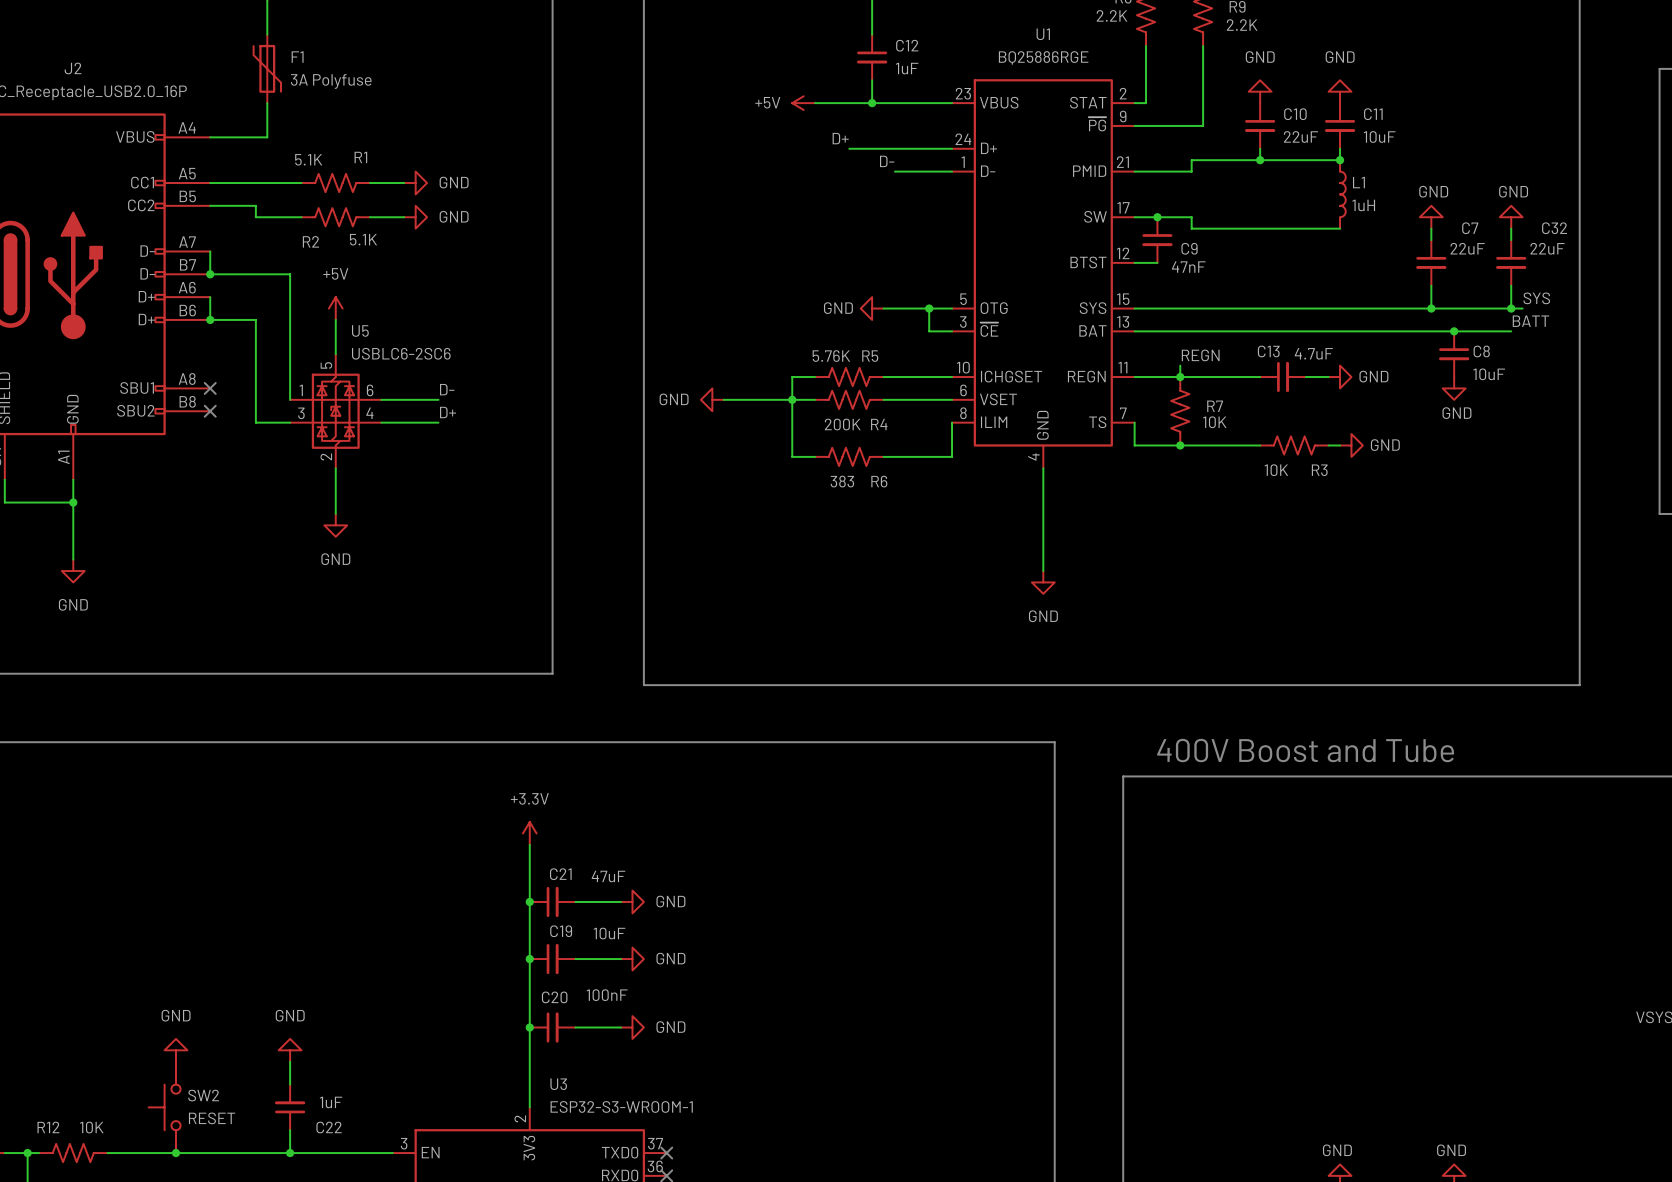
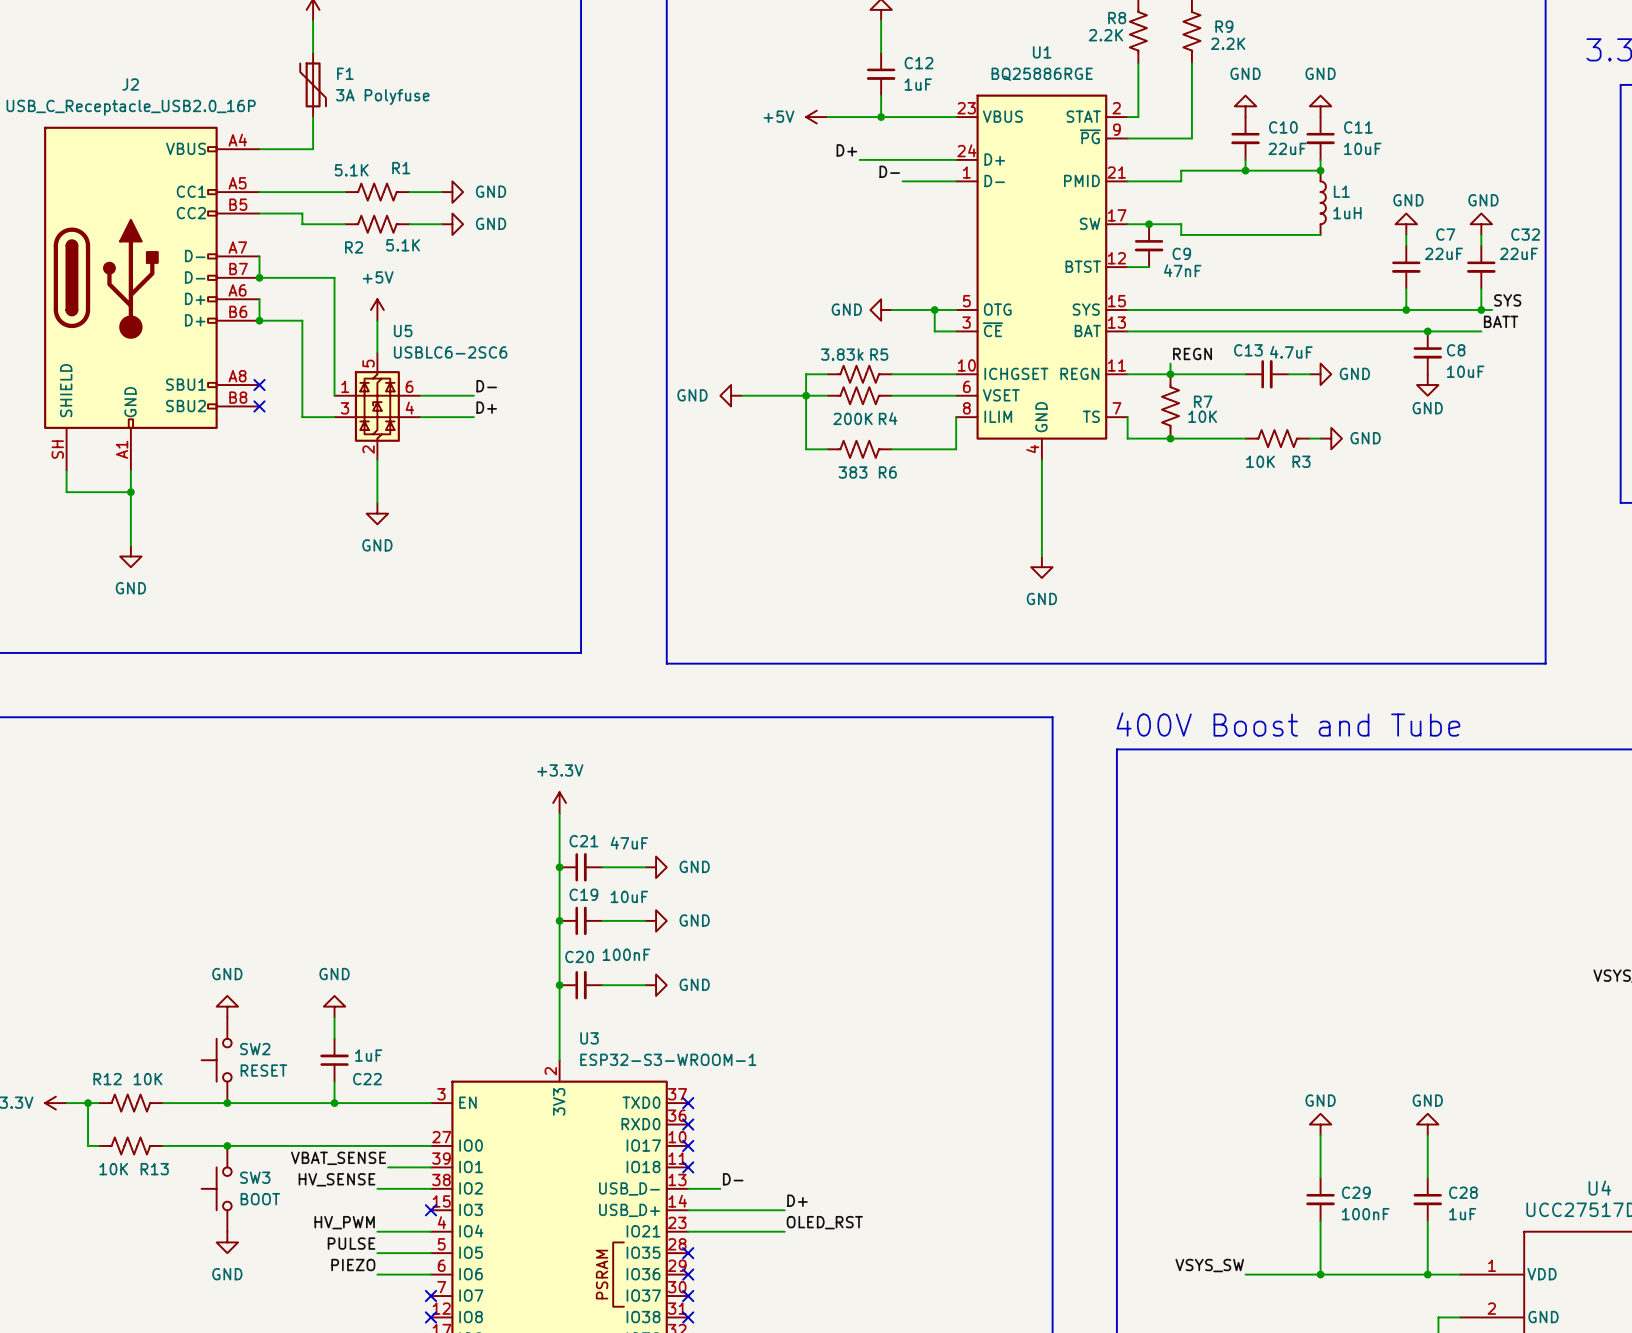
R5 value: 5.76K (831, 356) -> 3.83k (842, 354)

